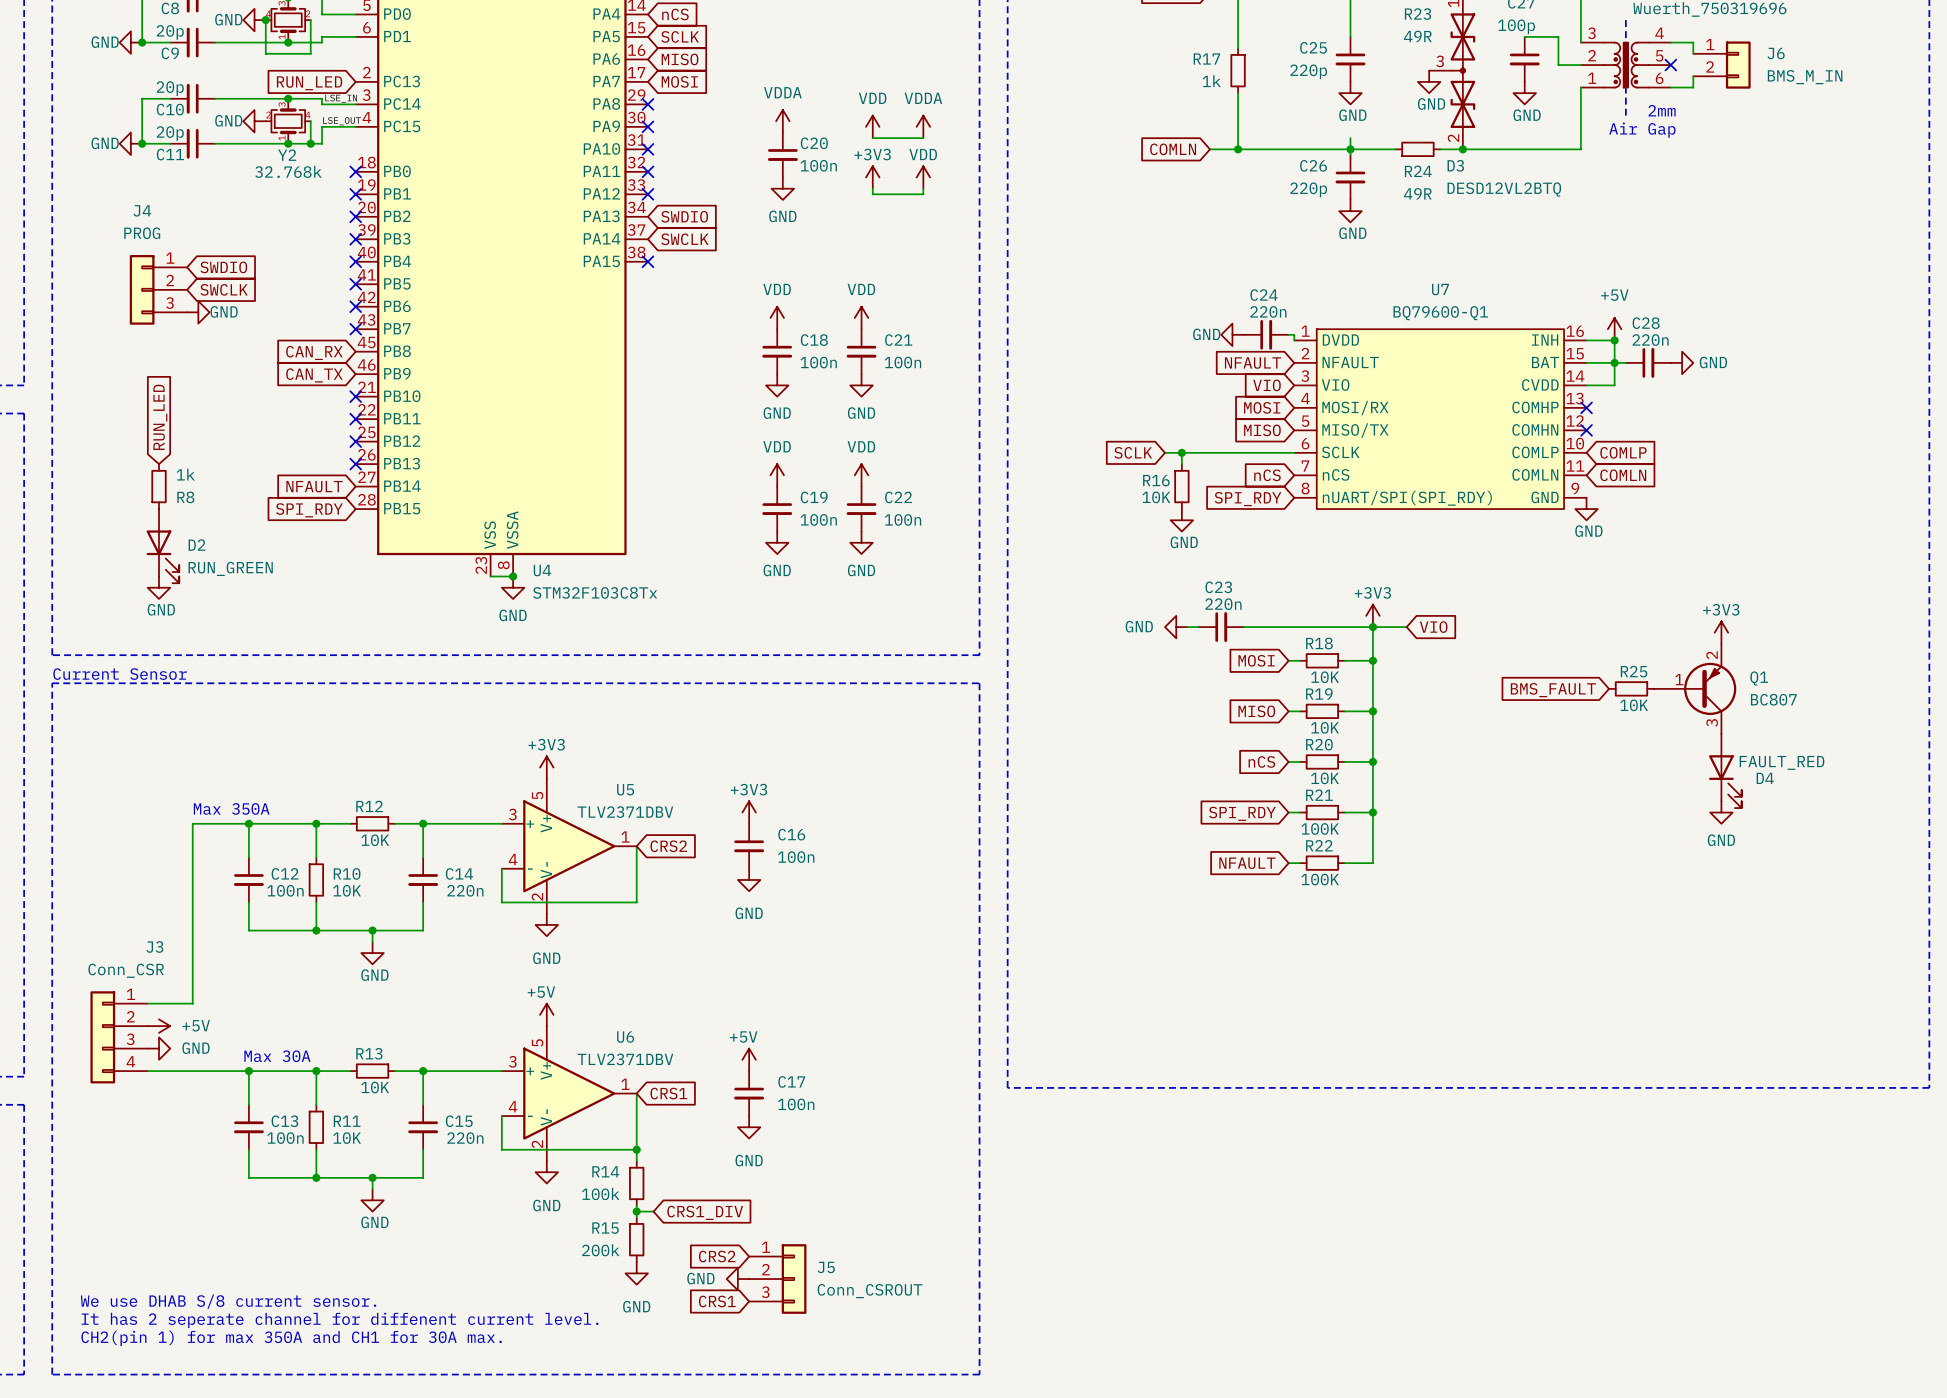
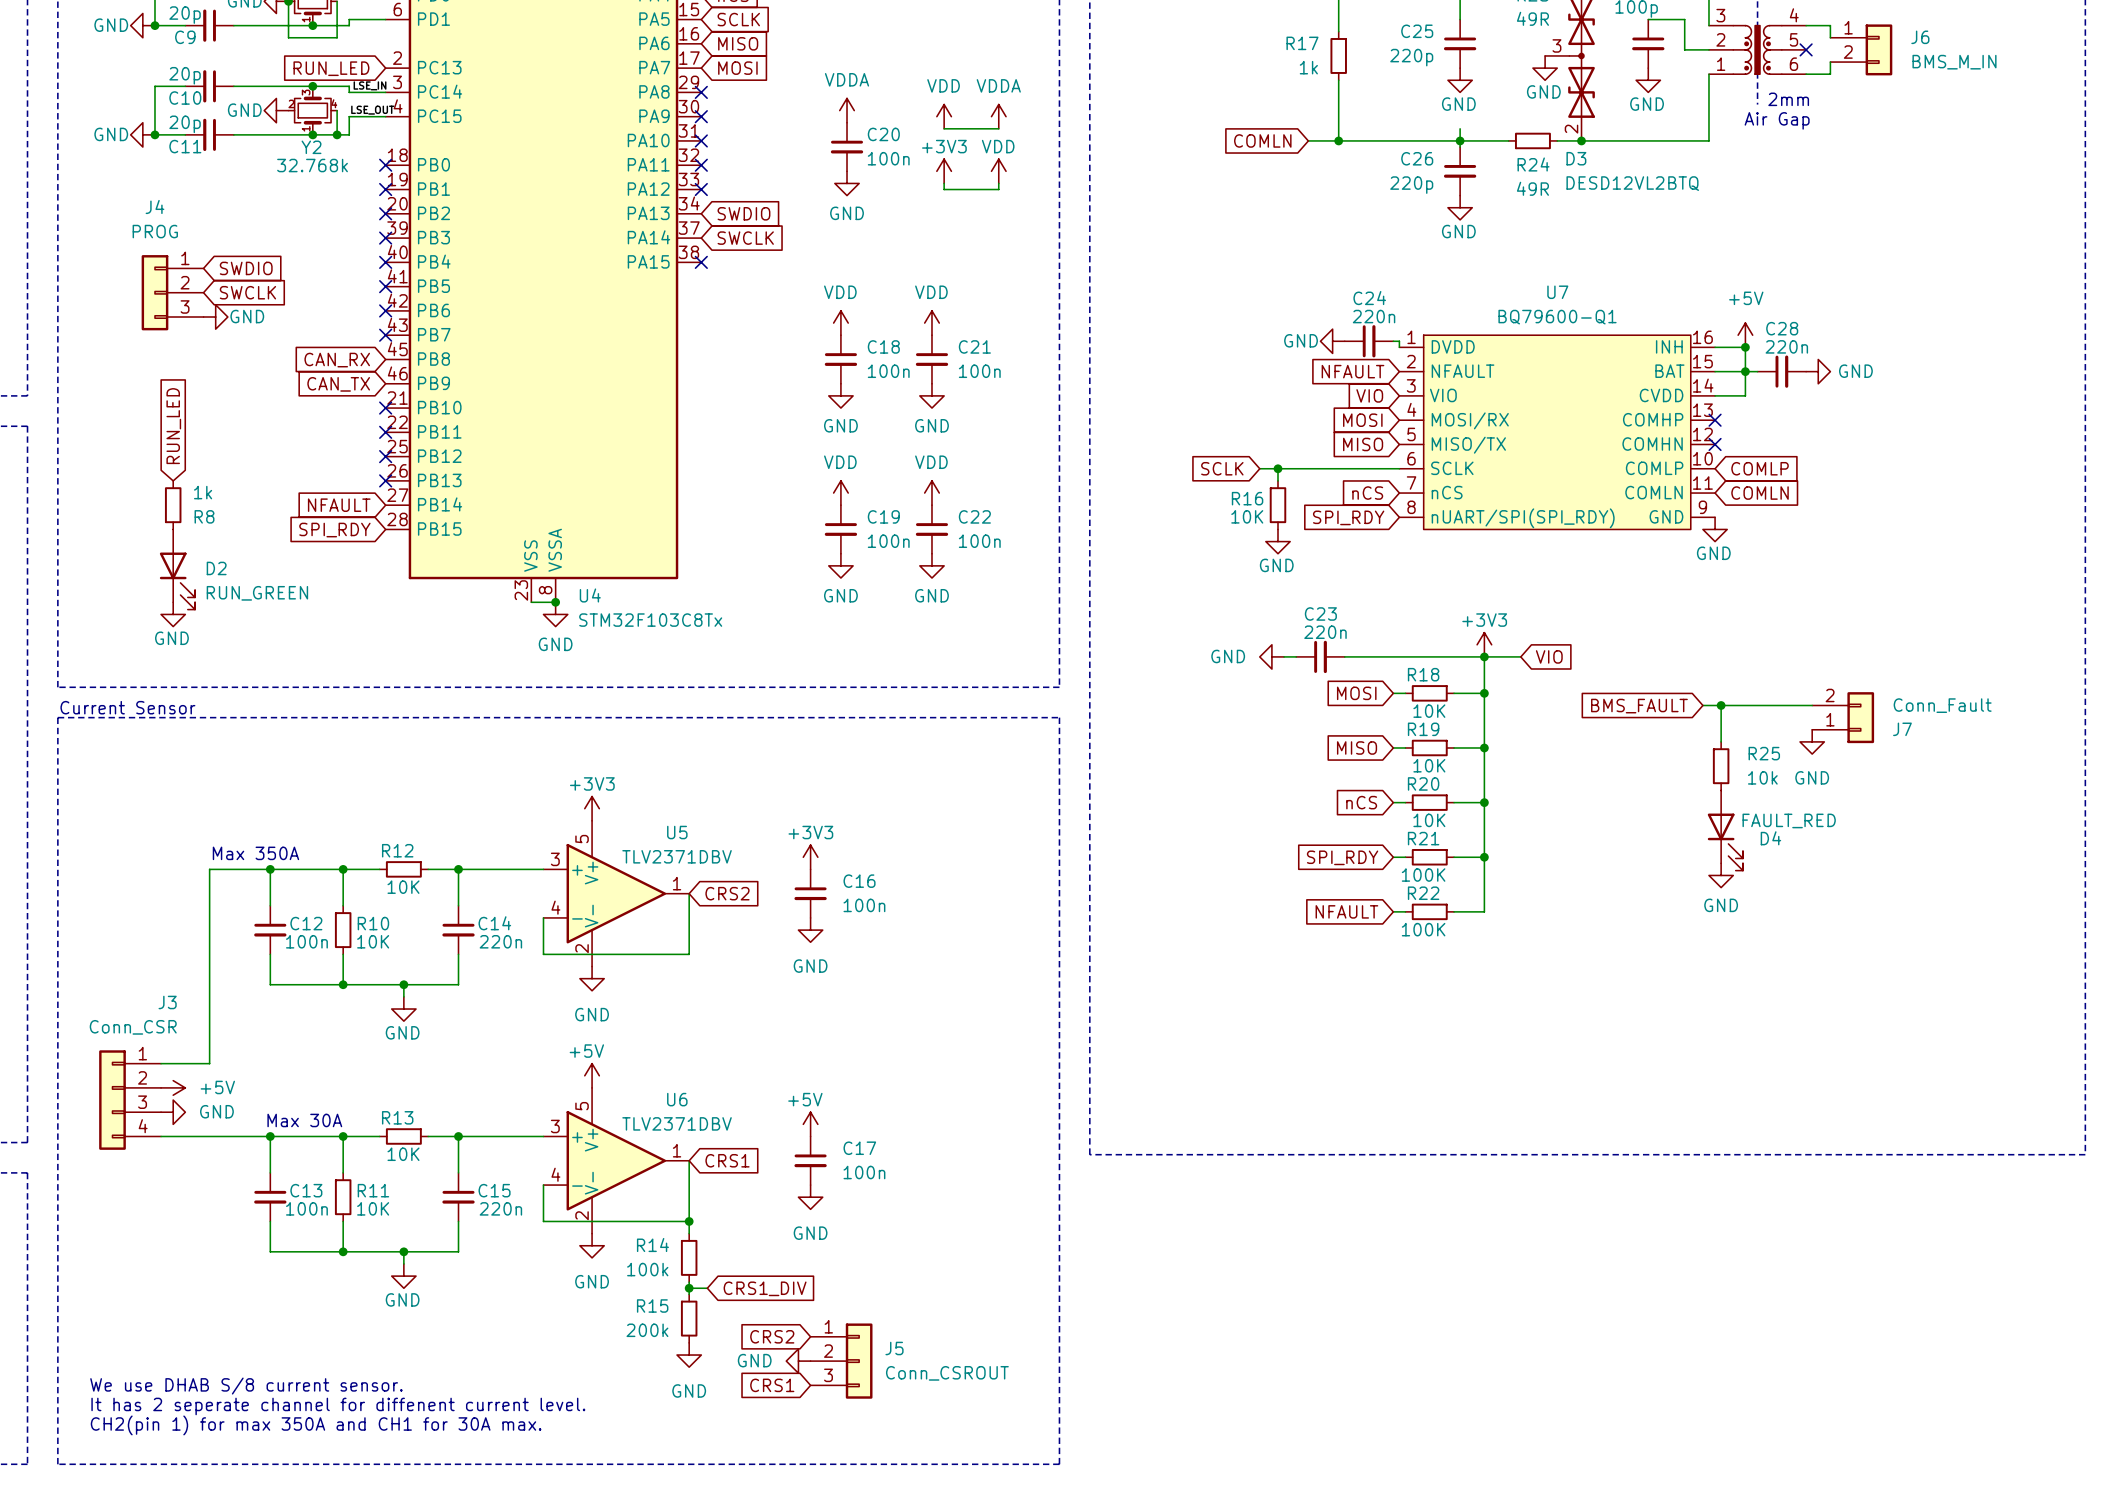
power symbol: +3V3 (1721, 632) -> none
R25 name position: R25 (1634, 671) -> R25 (1764, 753)
wire: none -> (1702, 705) (1812, 705)
wire: none -> (1721, 705) (1721, 741)
junction: none -> (1721, 705)
J7: none -> Conn_Fault (1843, 717)
R25 rotation: 0° (1631, 688) -> 90° clockwise (1721, 766)
R25 position: (1631, 688) -> (1721, 766)
Q1: BC807 (1695, 688) -> none
global label position: BMS_FAULT (1553, 690) -> BMS_FAULT (1639, 706)
R25 value: 10K (1634, 705) -> 10k (1762, 777)
power symbol: none -> GND (1812, 741)
D4 position: (1725, 770) -> (1725, 830)
power symbol: GND (1721, 812) -> none
power symbol: none -> GND (1721, 875)

